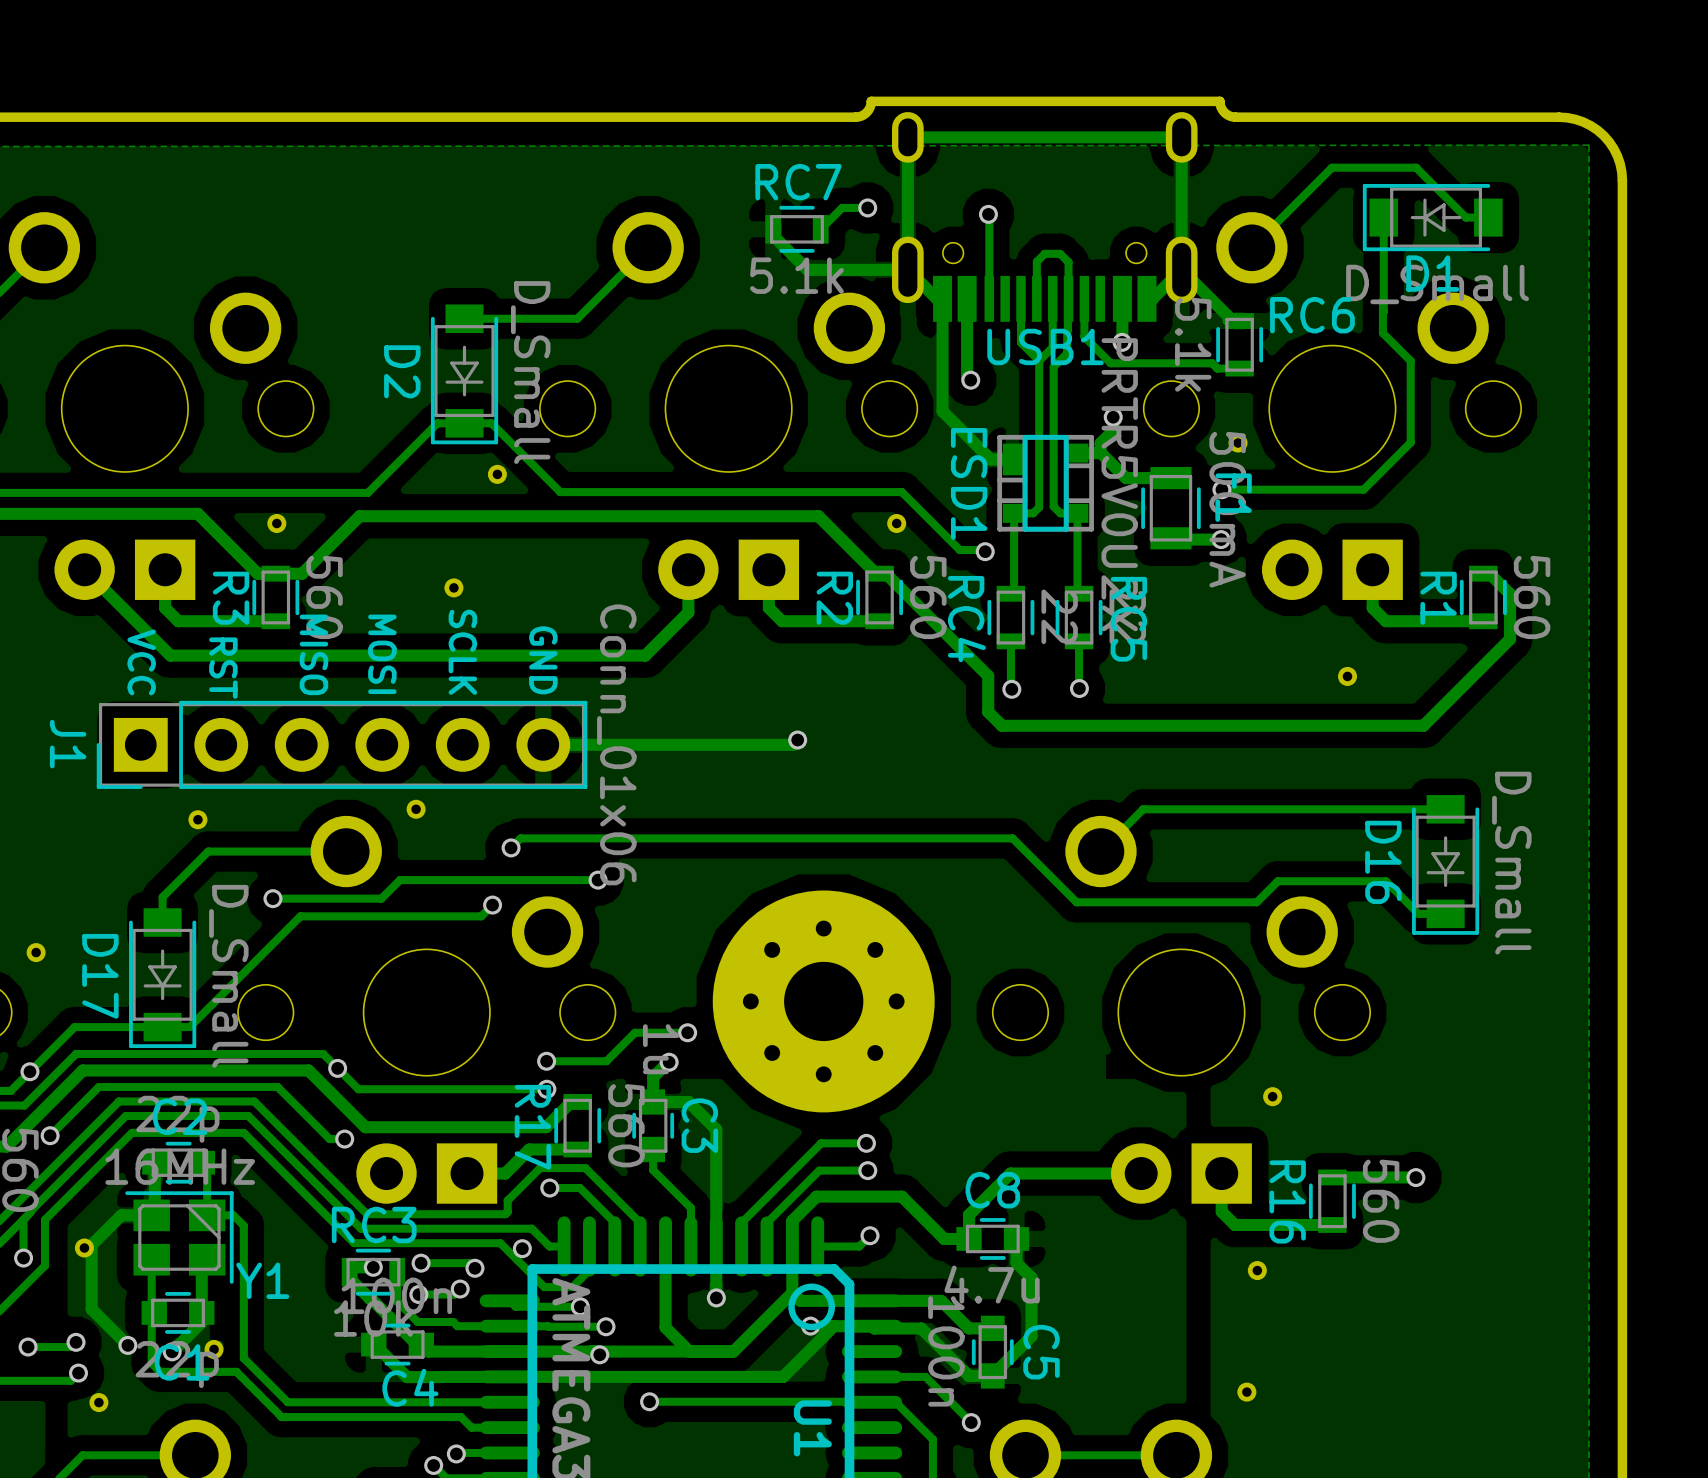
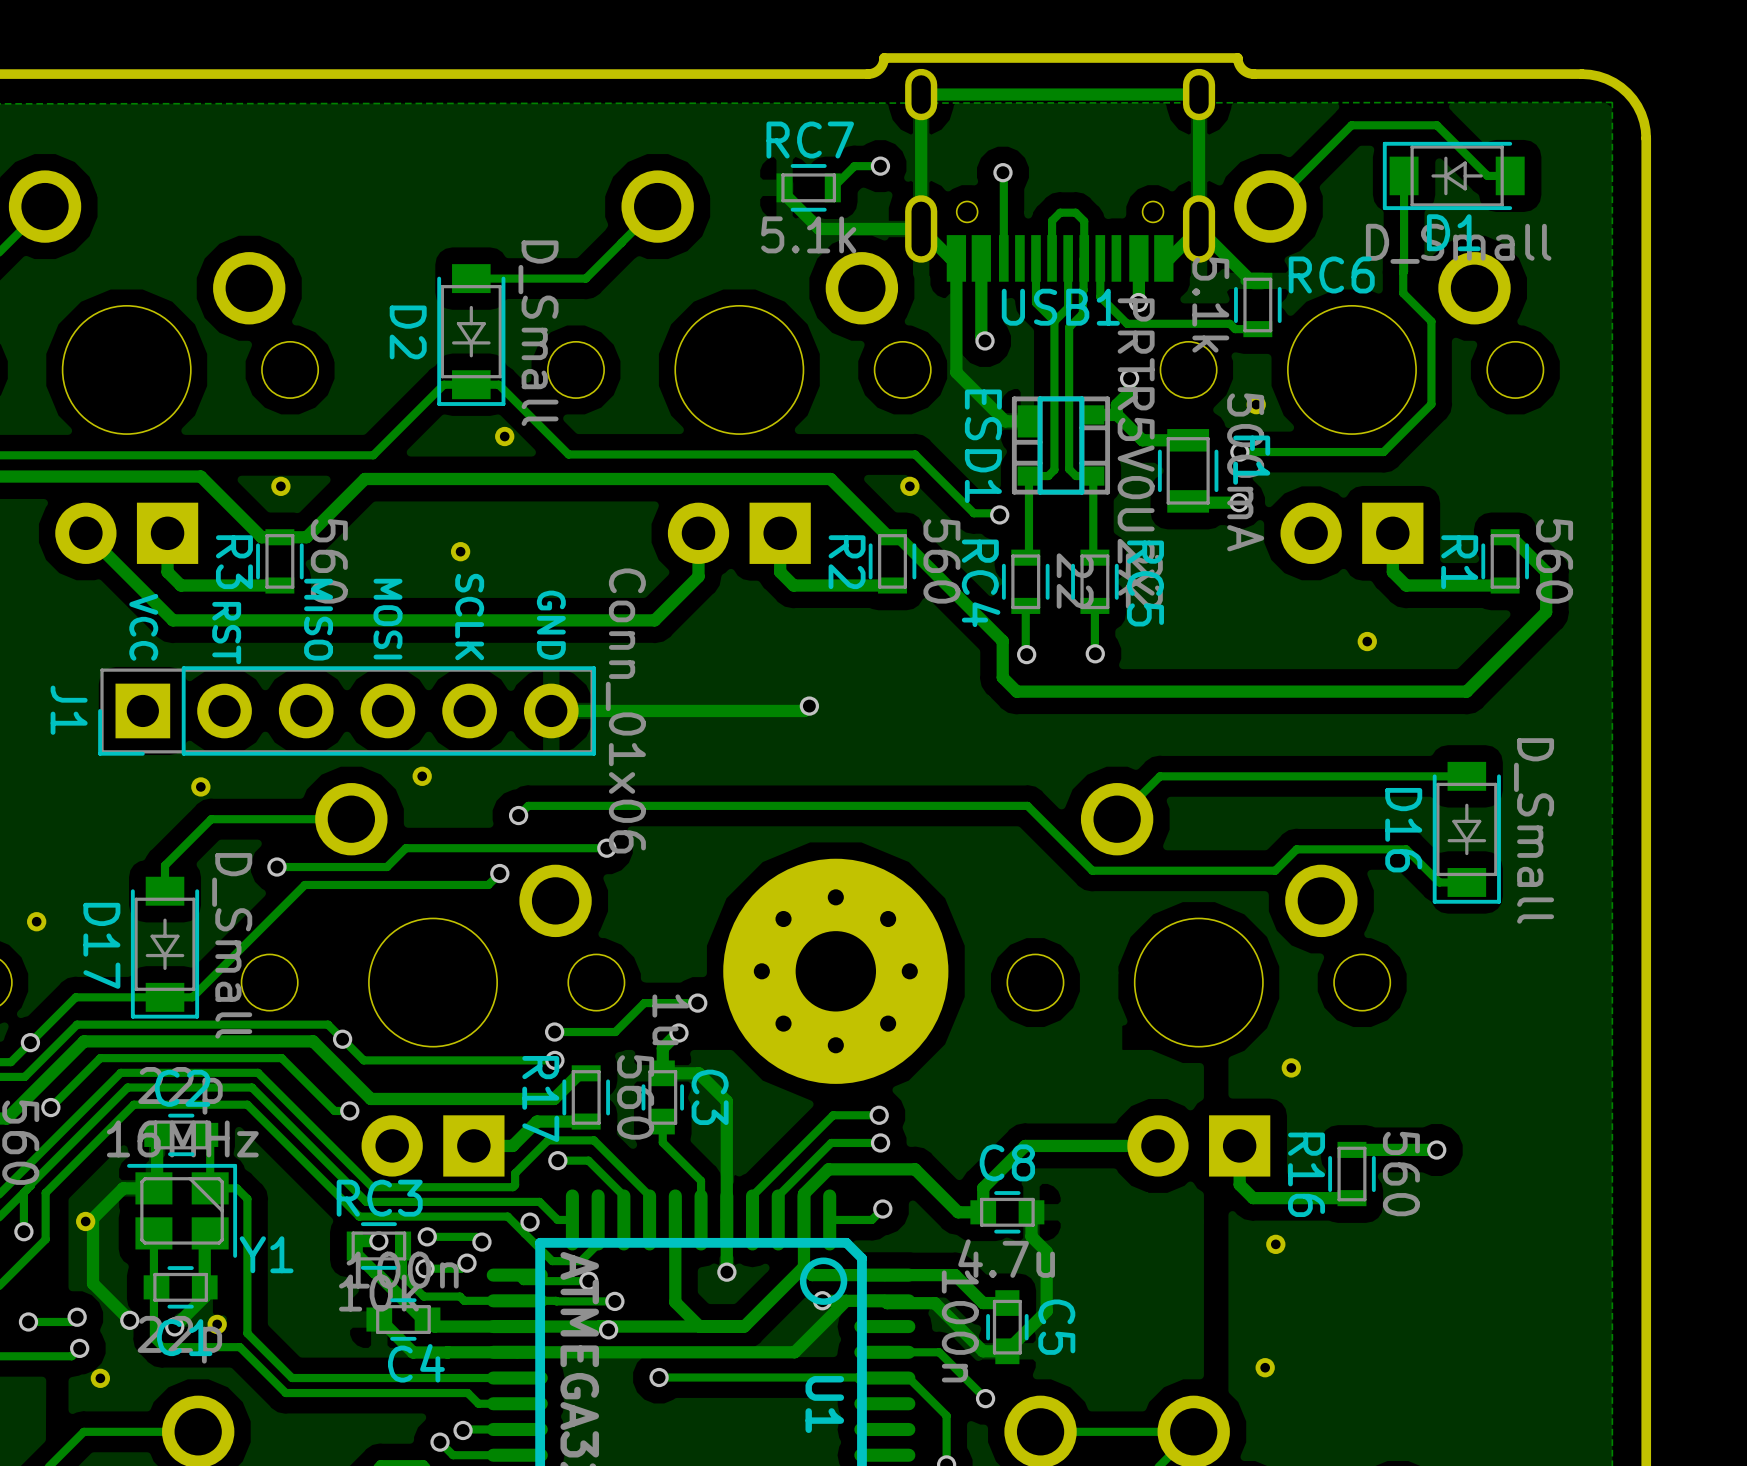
track: (1510, 594) (1510, 639) (1423, 725) -> (1532, 557) (1546, 571) (1546, 612) (1466, 691) (1444, 691)

